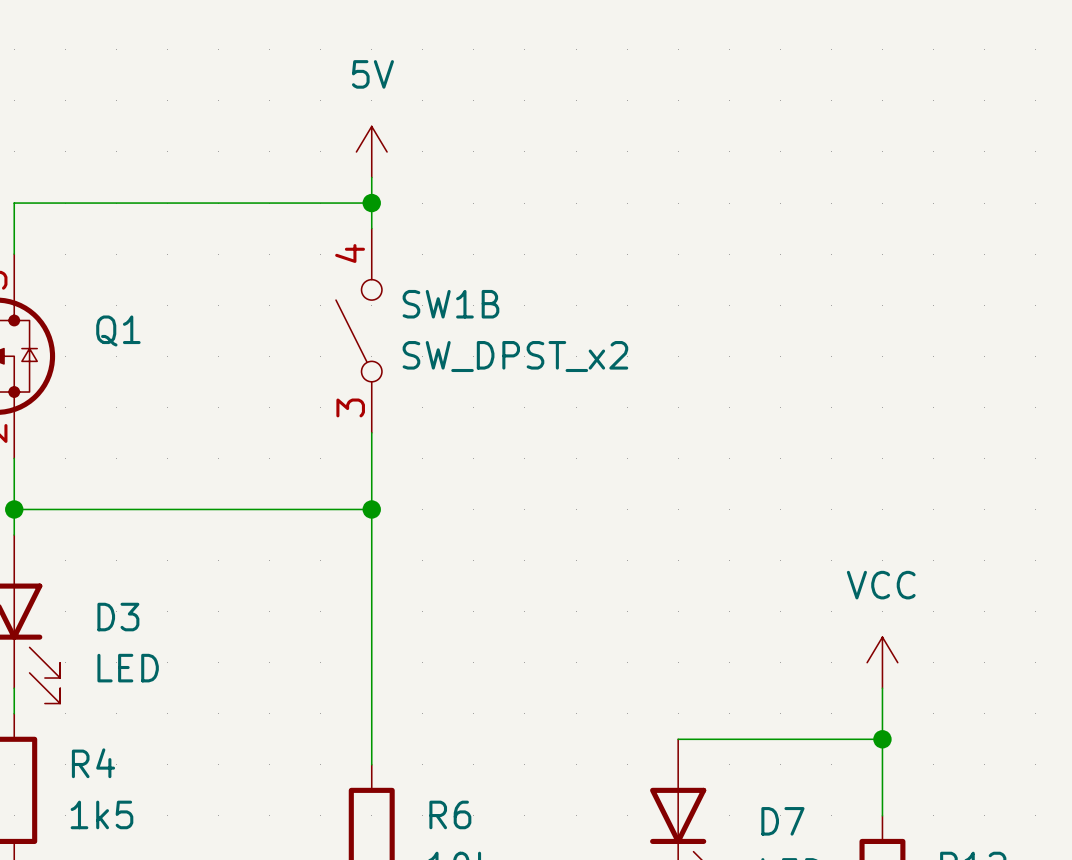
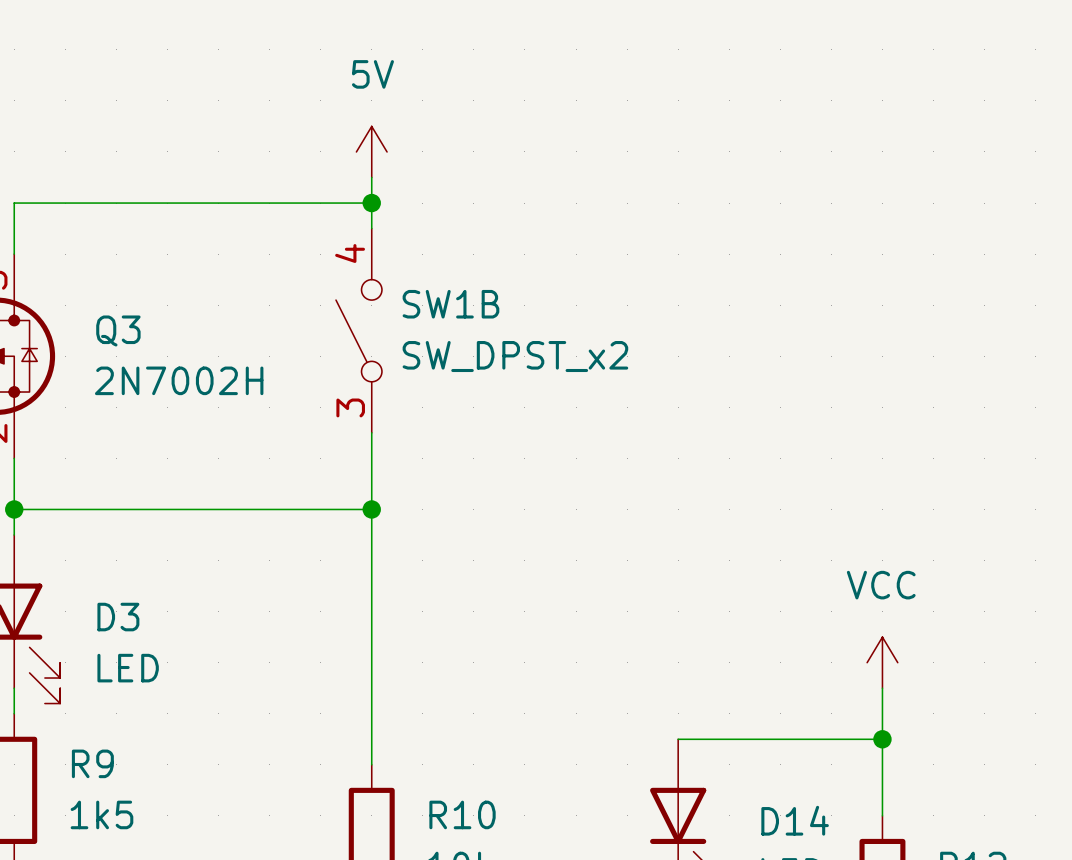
Q1 name: Q1 (118, 330) -> Q3 (118, 330)
Q1 value: none -> 2N7002H (179, 380)
R4 name: R4 (93, 763) -> R9 (92, 763)
R6 name: R6 (450, 814) -> R10 (462, 814)
D7 name: D7 (782, 821) -> D14 (795, 820)

